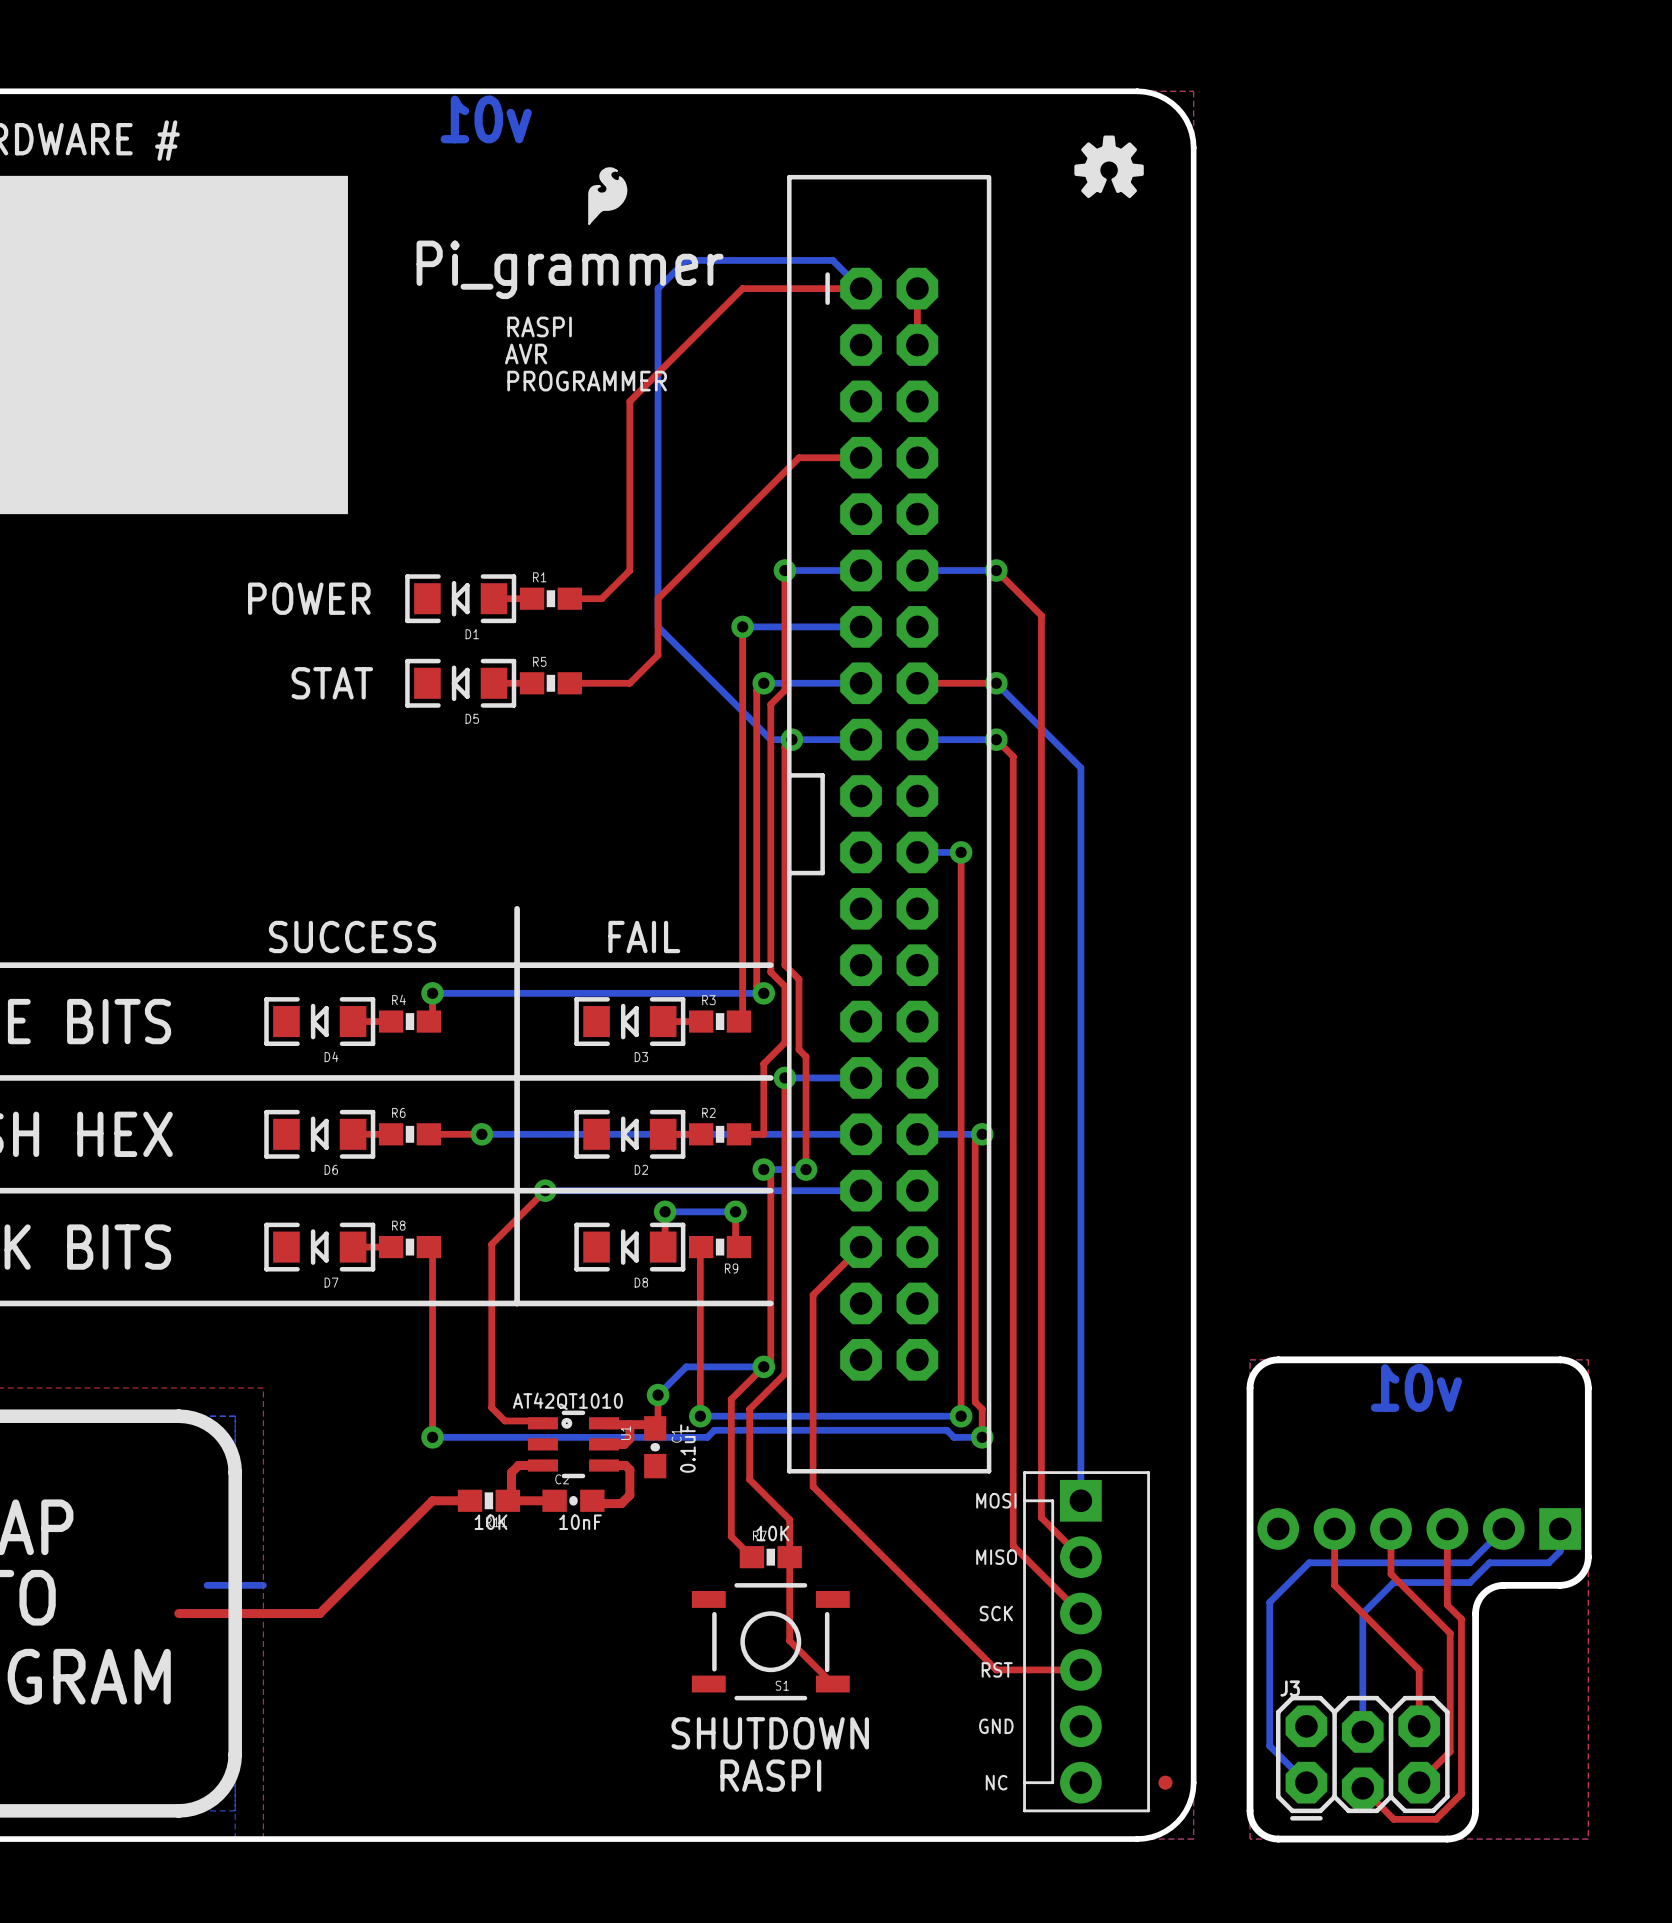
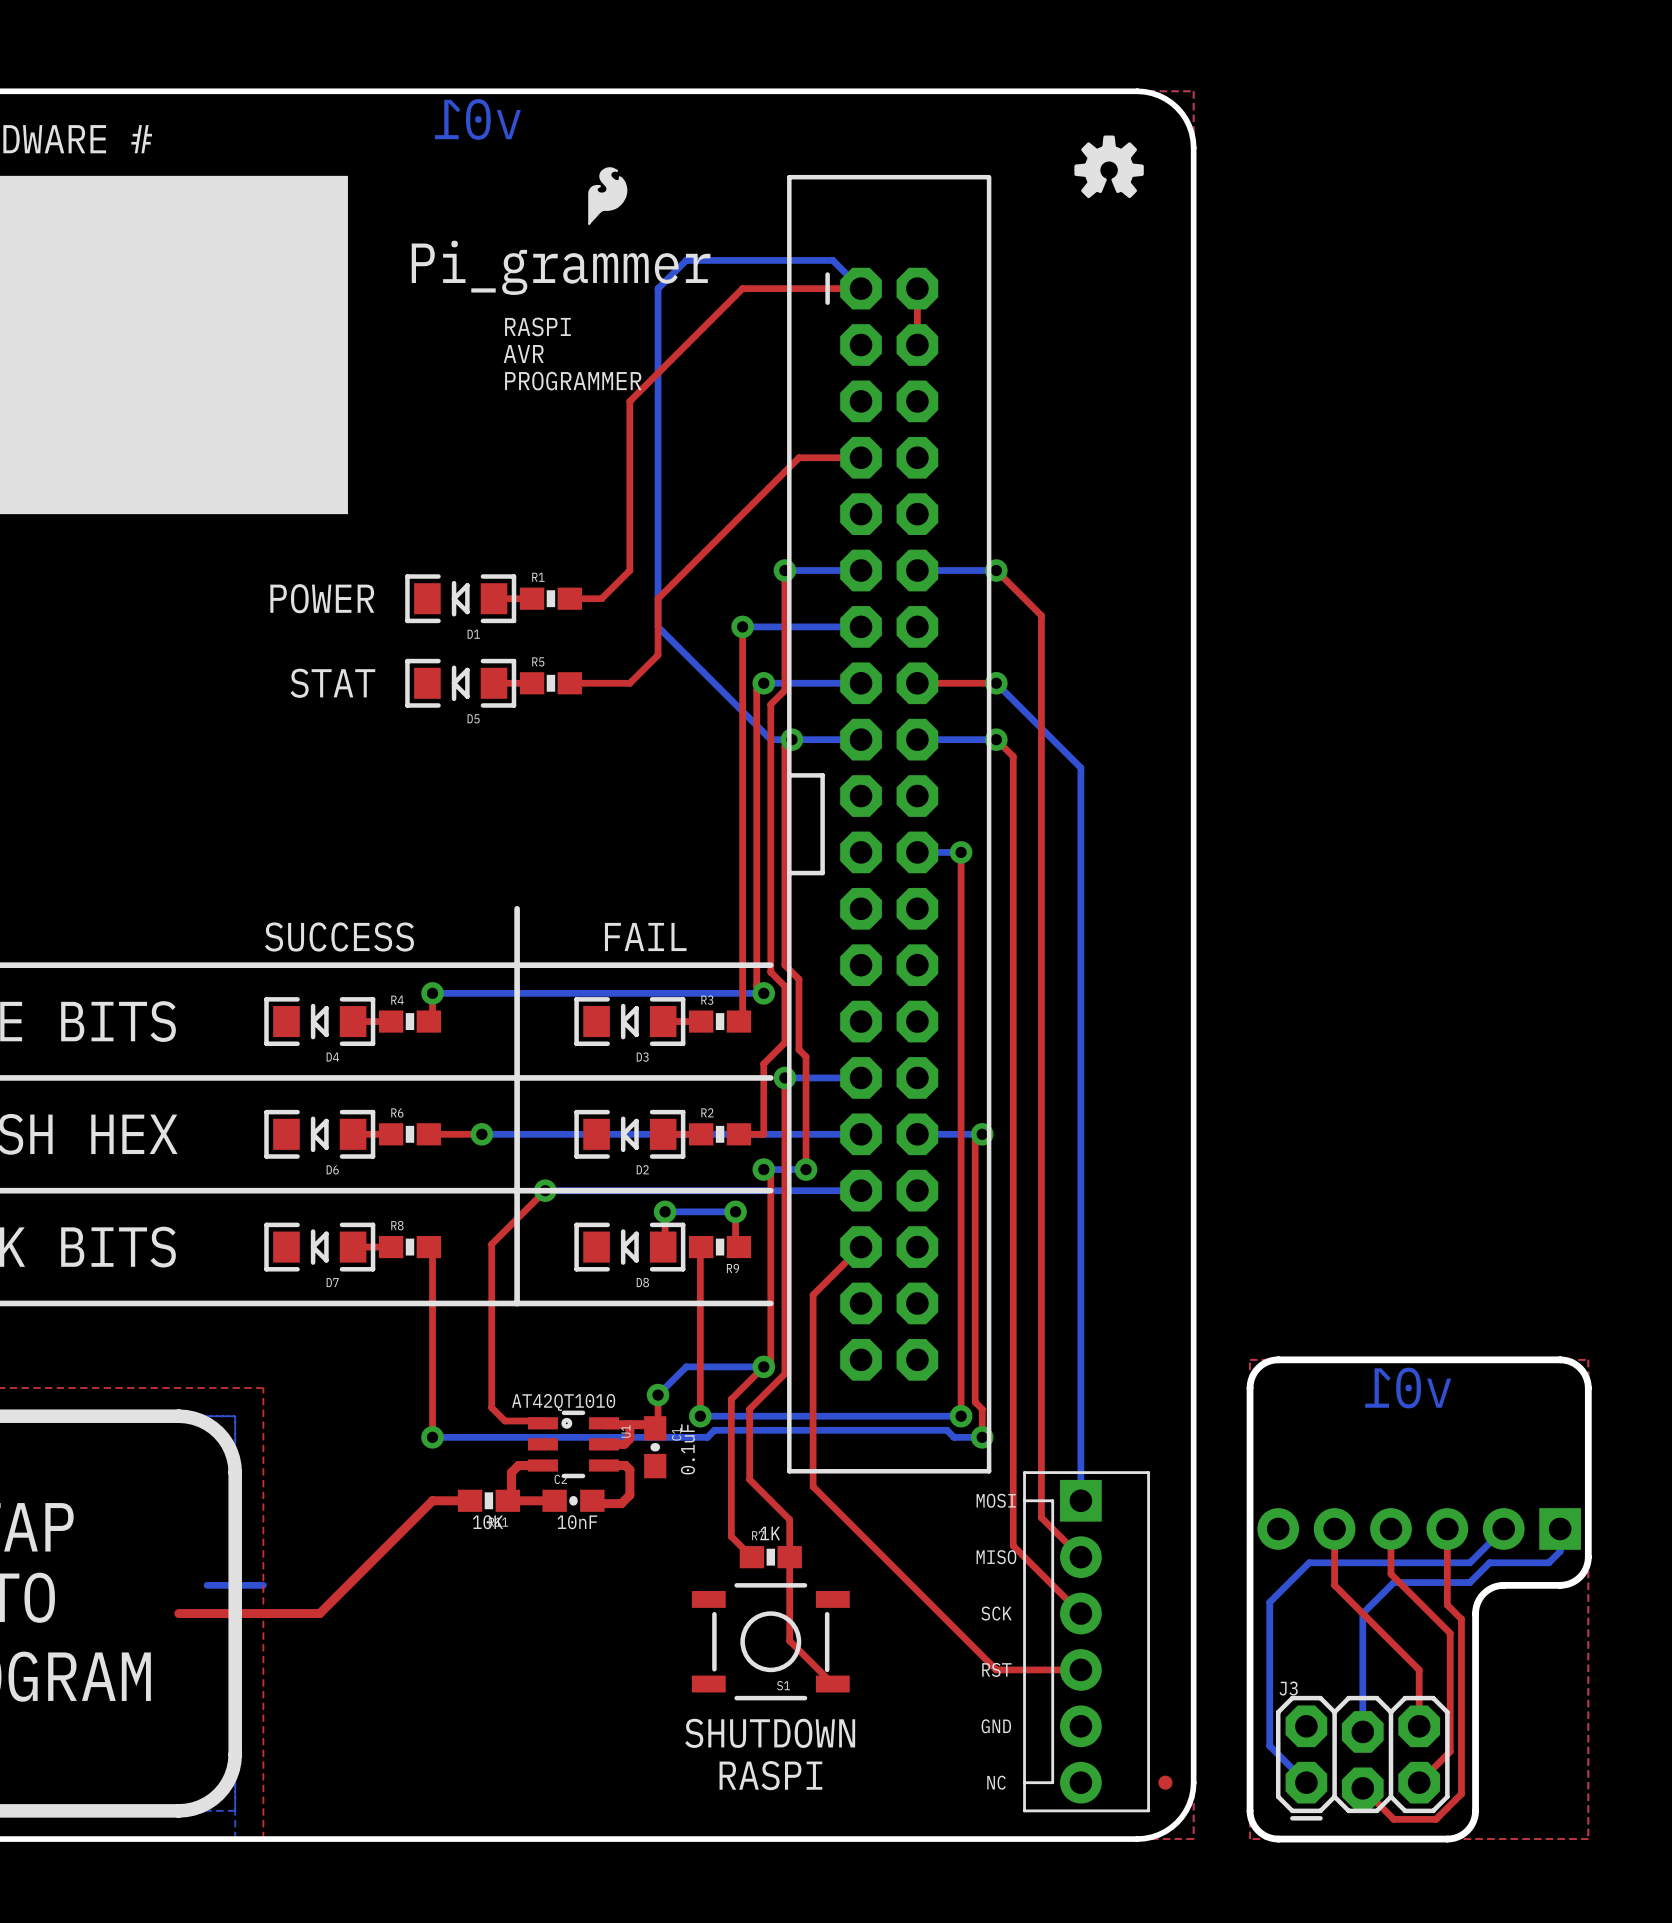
text: 10K (772, 1533) -> 1K (770, 1533)

